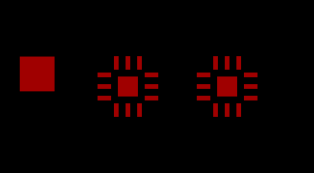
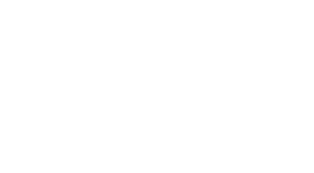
part: (37, 73) -> none
part: (127, 86) -> none
part: (227, 86) -> none

